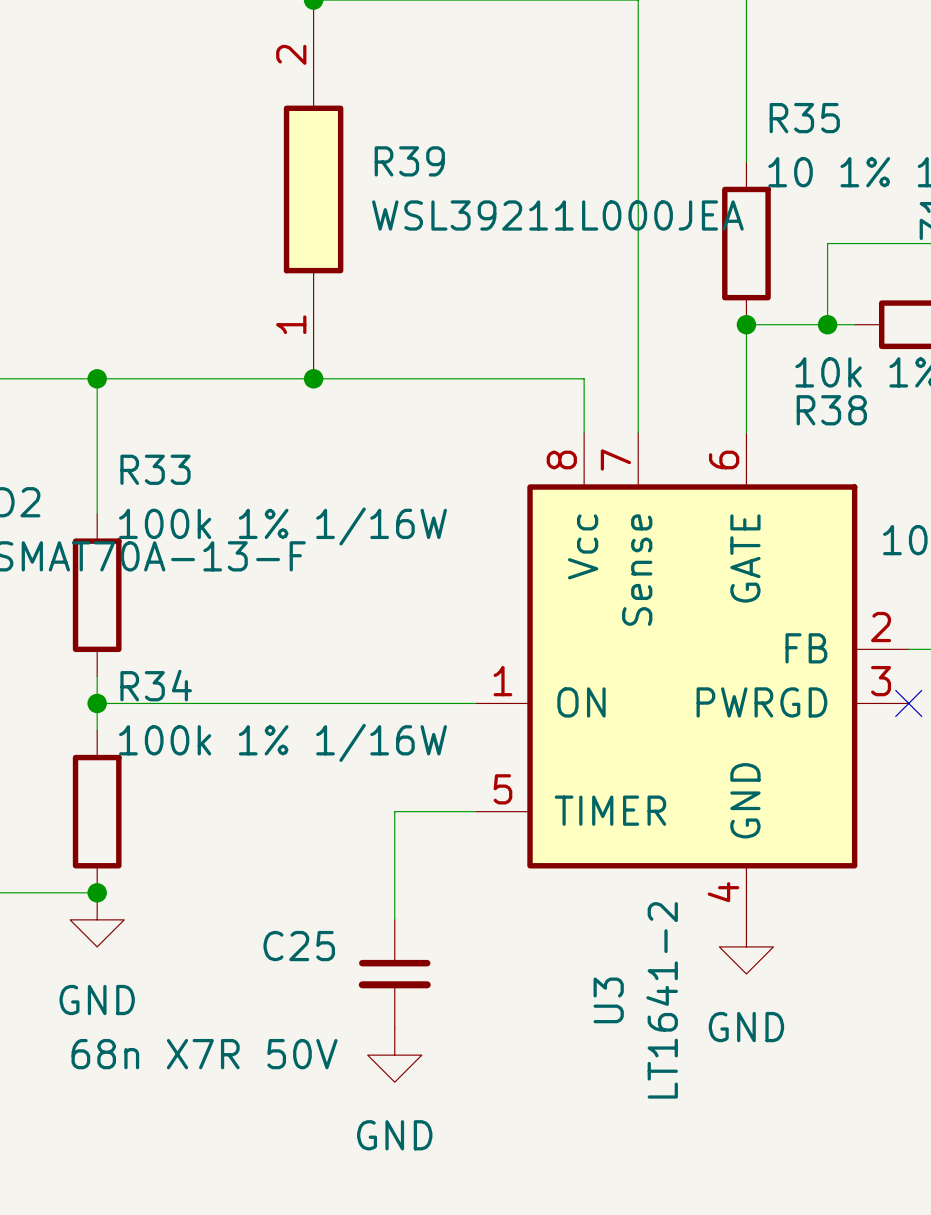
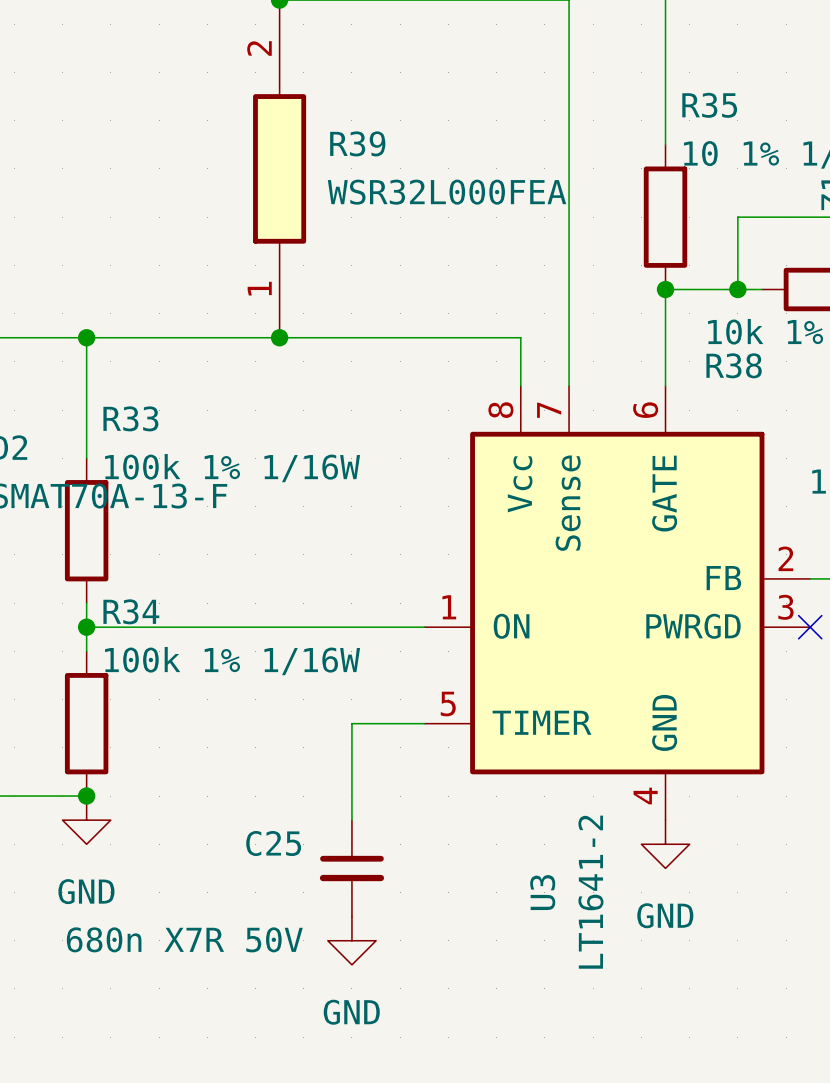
R39 value: WSL39211L000JEA (557, 215) -> WSR32L000FEA (447, 192)
C25 value: 68n X7R 50V (204, 1054) -> 680n X7R 50V (184, 939)

